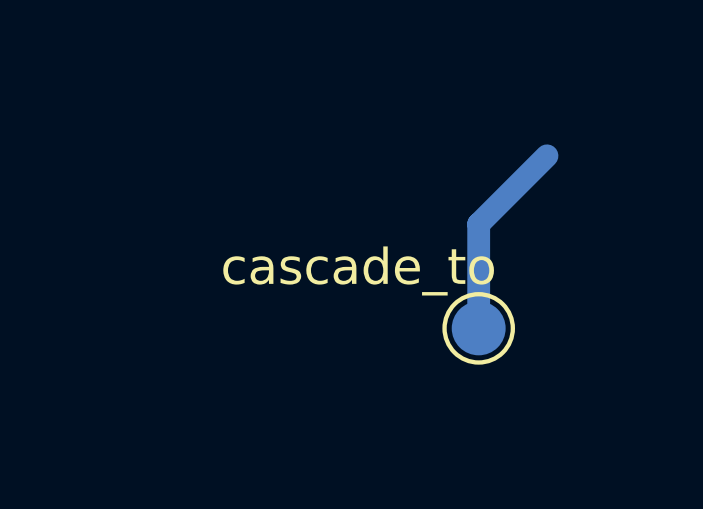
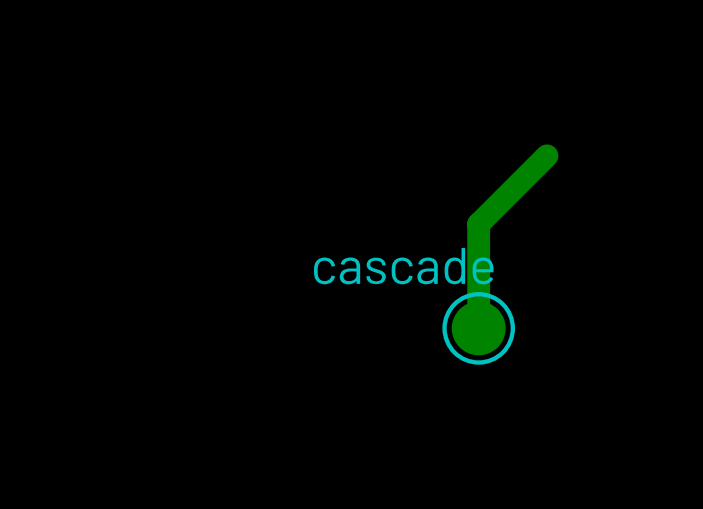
text: cascade_to (358, 270) -> cascade (403, 266)

